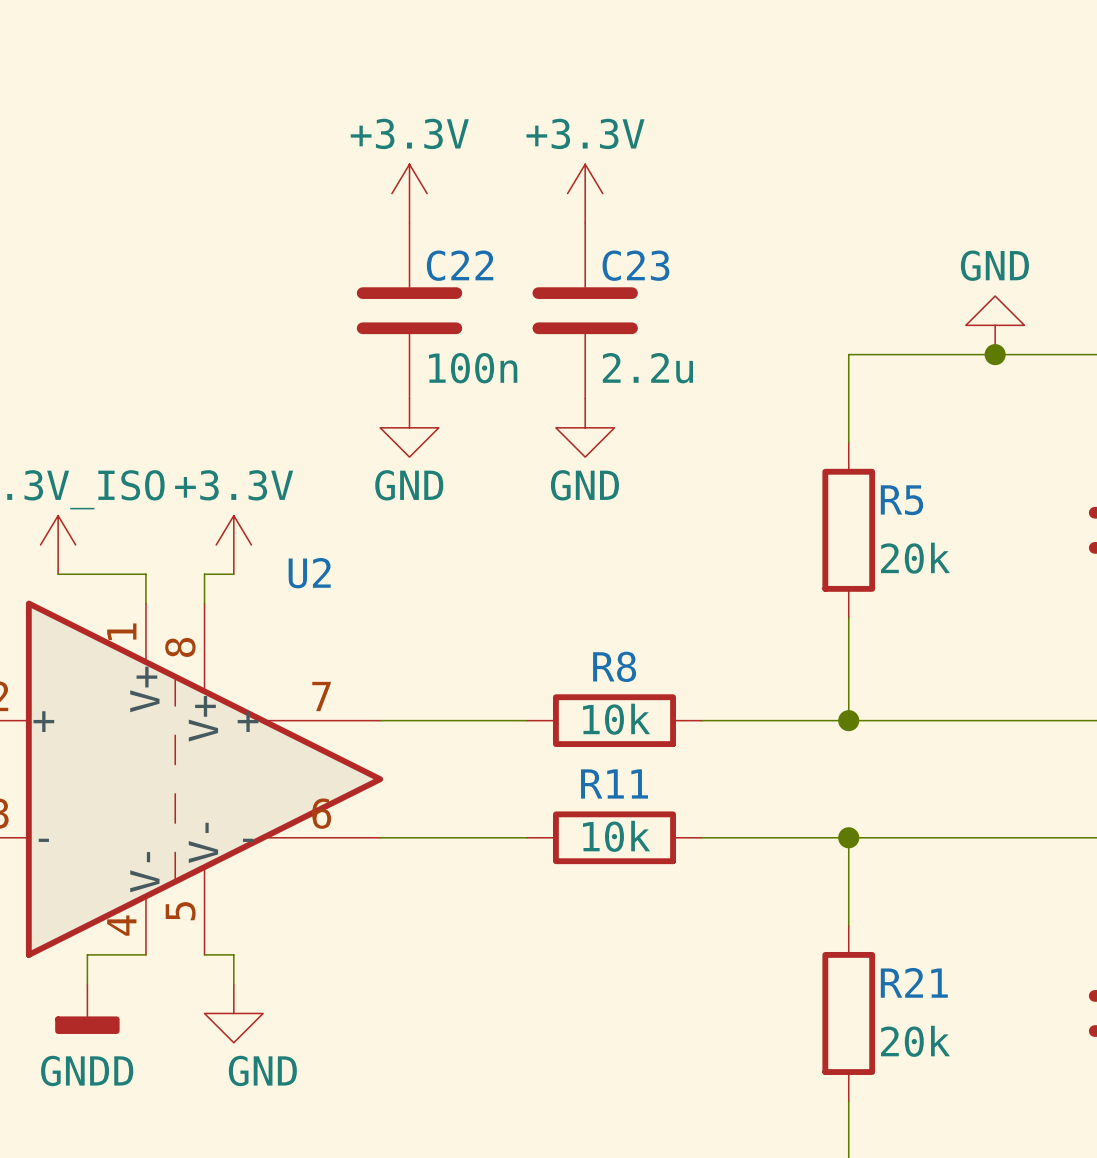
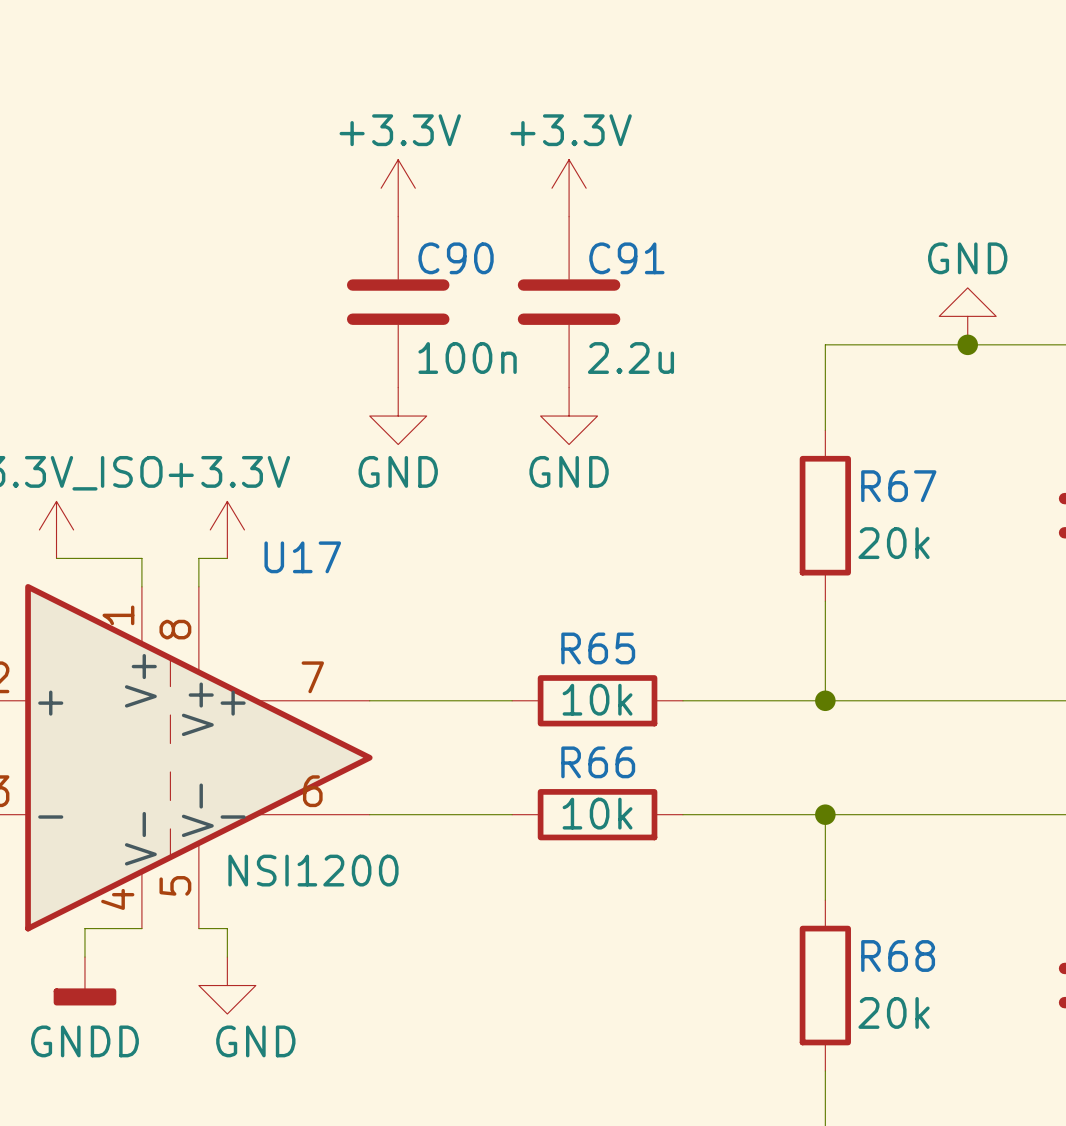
C22 name: C22 (460, 265) -> C90 (456, 258)
C23 name: C23 (635, 265) -> C91 (626, 258)
R5 name: R5 (902, 500) -> R67 (898, 486)
U2 name: U2 (309, 573) -> U17 (302, 557)
R8 name: R8 (614, 666) -> R65 (598, 648)
R11 name: R11 (614, 783) -> R66 (598, 762)
U2 text: none -> NSI1200 (313, 870)
R21 name: R21 (914, 982) -> R68 (898, 956)

